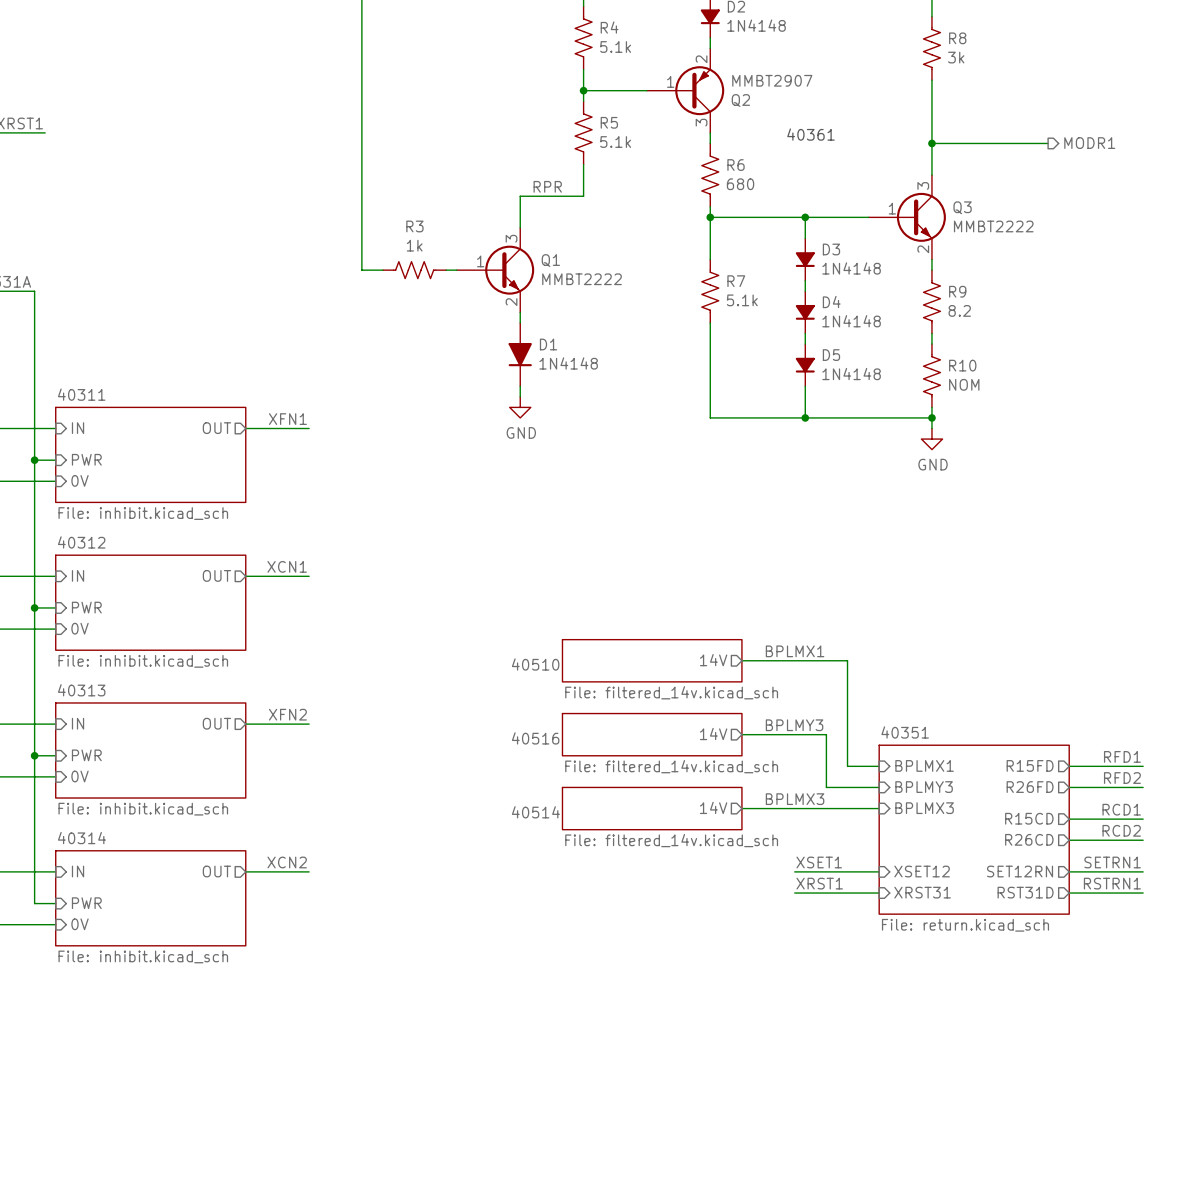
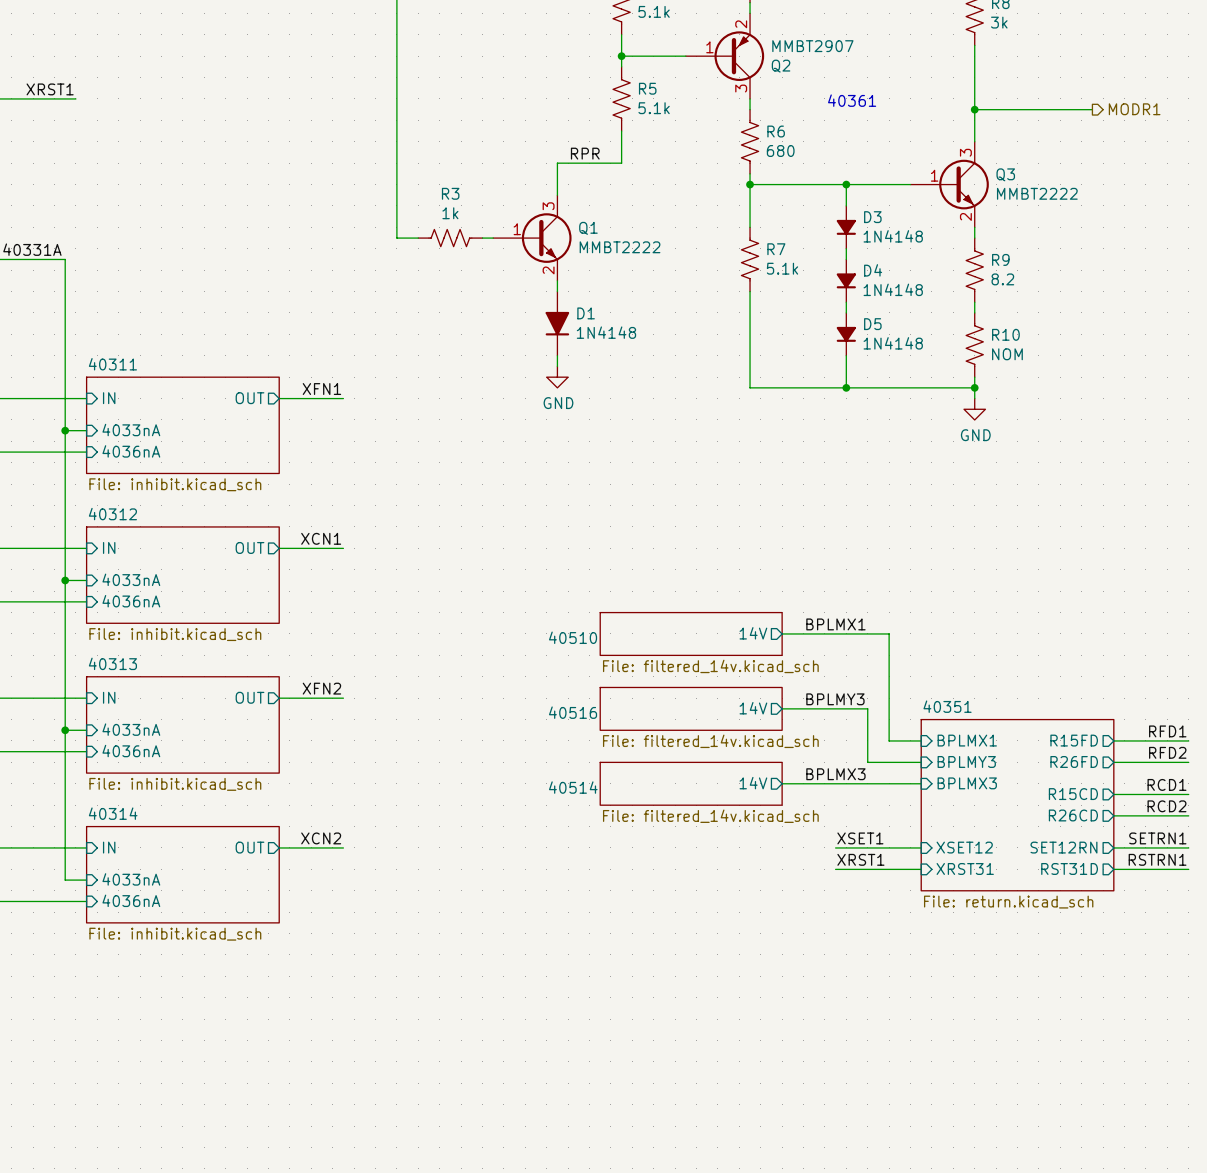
sheet pin: PWR (86, 459) -> 4033nA (131, 430)
sheet pin: 0V (80, 480) -> 4036nA (131, 451)
sheet pin: PWR (86, 607) -> 4033nA (131, 579)
sheet pin: 0V (80, 628) -> 4036nA (131, 601)
sheet pin: PWR (86, 755) -> 4033nA (131, 729)
sheet pin: 0V (80, 776) -> 4036nA (131, 751)
sheet pin: PWR (86, 903) -> 4033nA (131, 879)
sheet pin: 0V (80, 924) -> 4036nA (131, 900)

